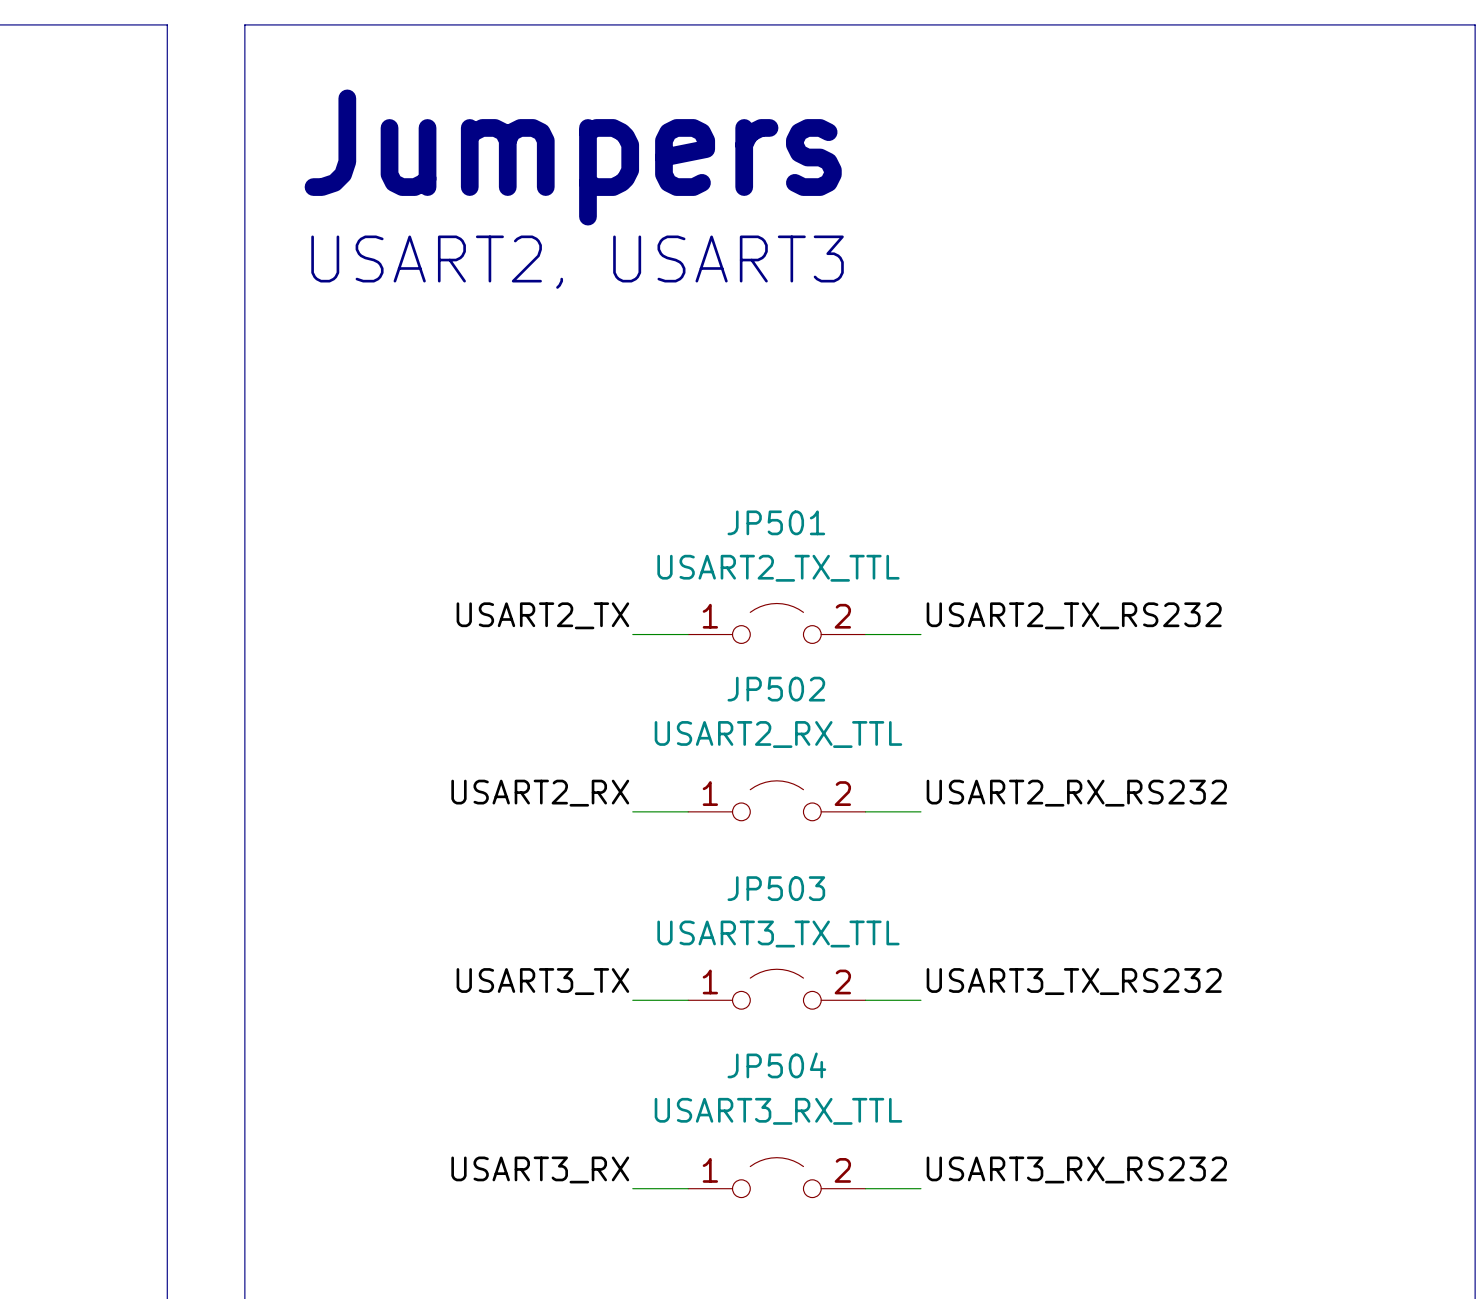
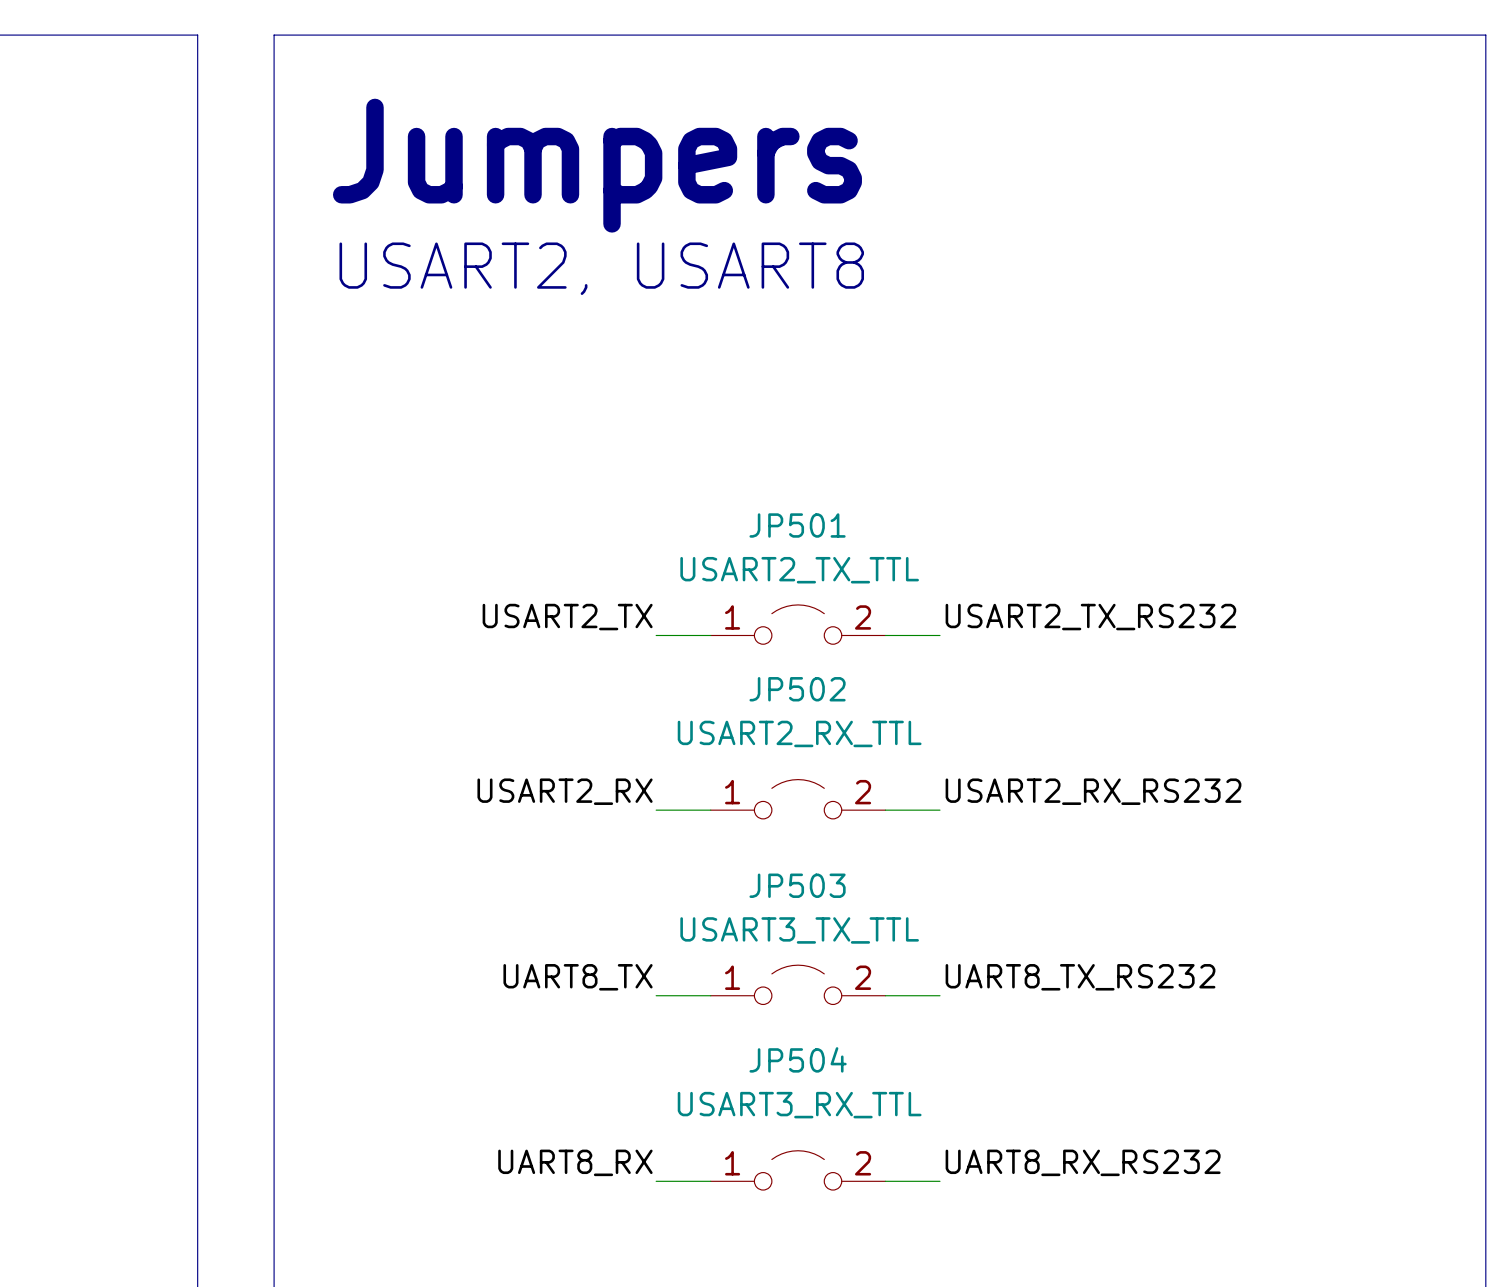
text: USART2, USART3 (577, 262) -> USART2, USART8 (601, 268)
label: USART3_TX (542, 981) -> UART8_TX (578, 977)
label: USART3_TX_RS232 (1074, 981) -> UART8_TX_RS232 (1080, 977)
label: USART3_RX (540, 1169) -> UART8_RX (575, 1162)
label: USART3_RX_RS232 (1076, 1169) -> UART8_RX_RS232 (1083, 1162)

